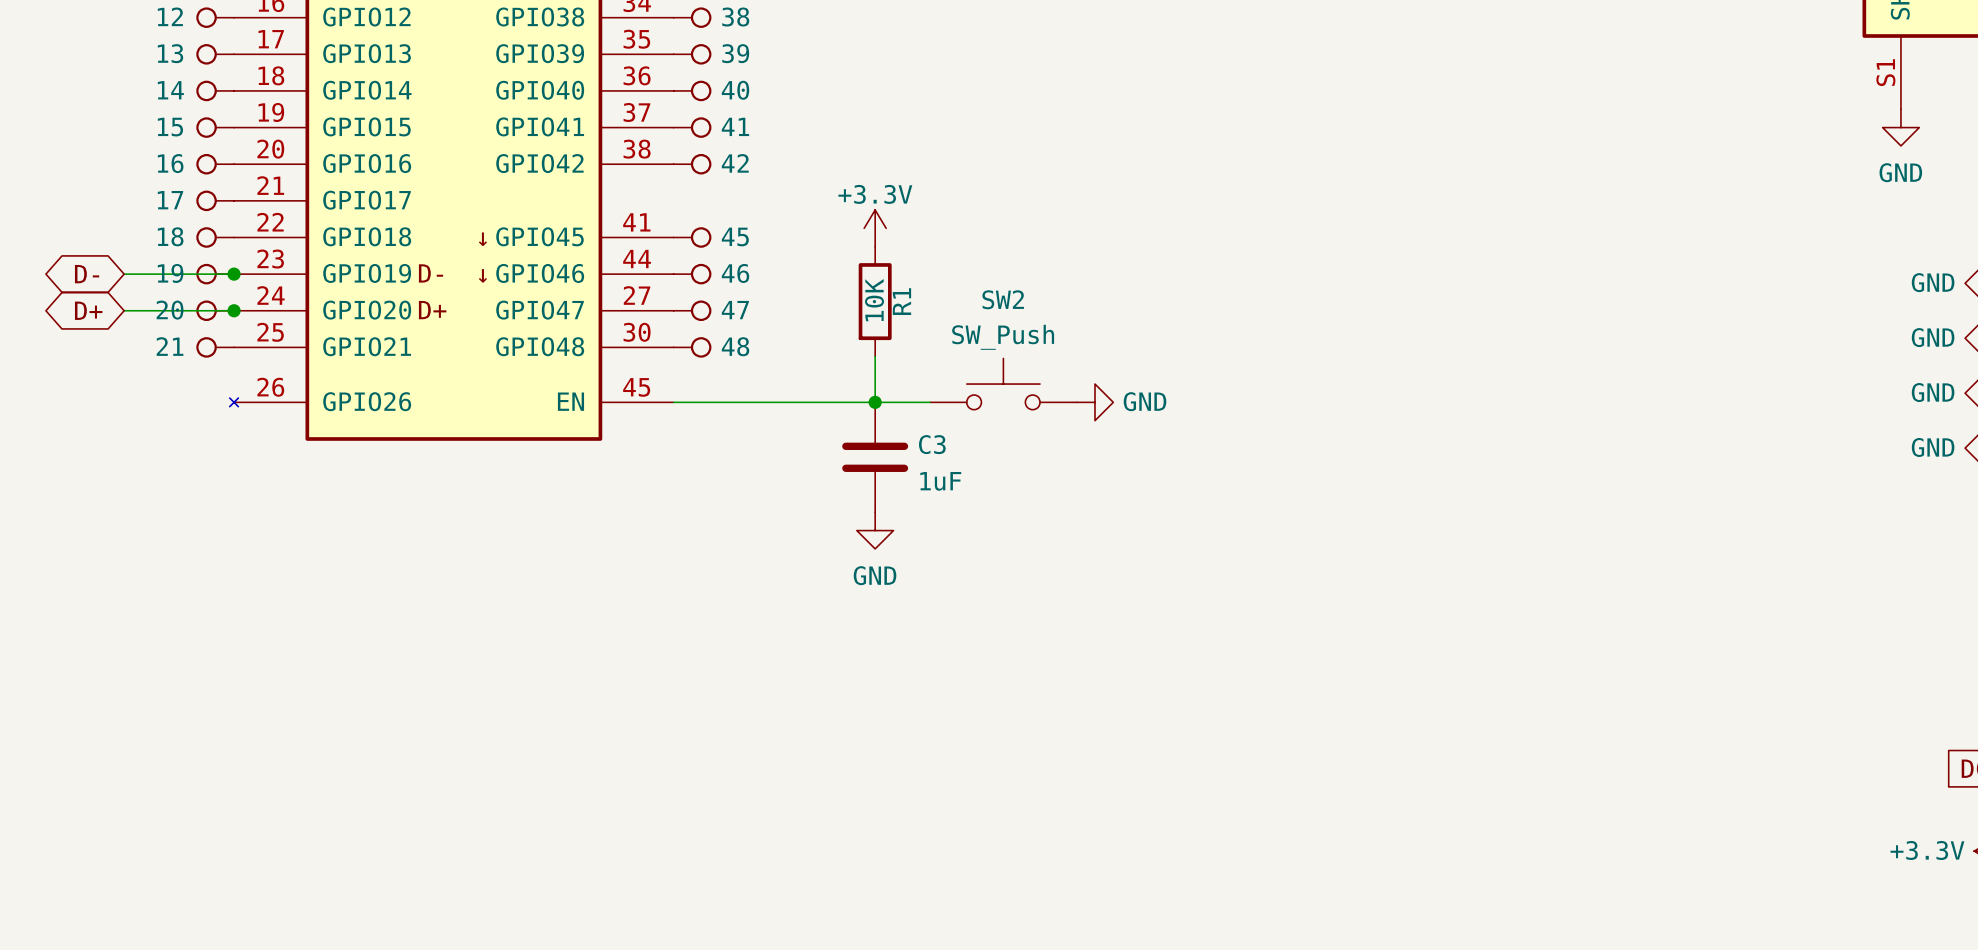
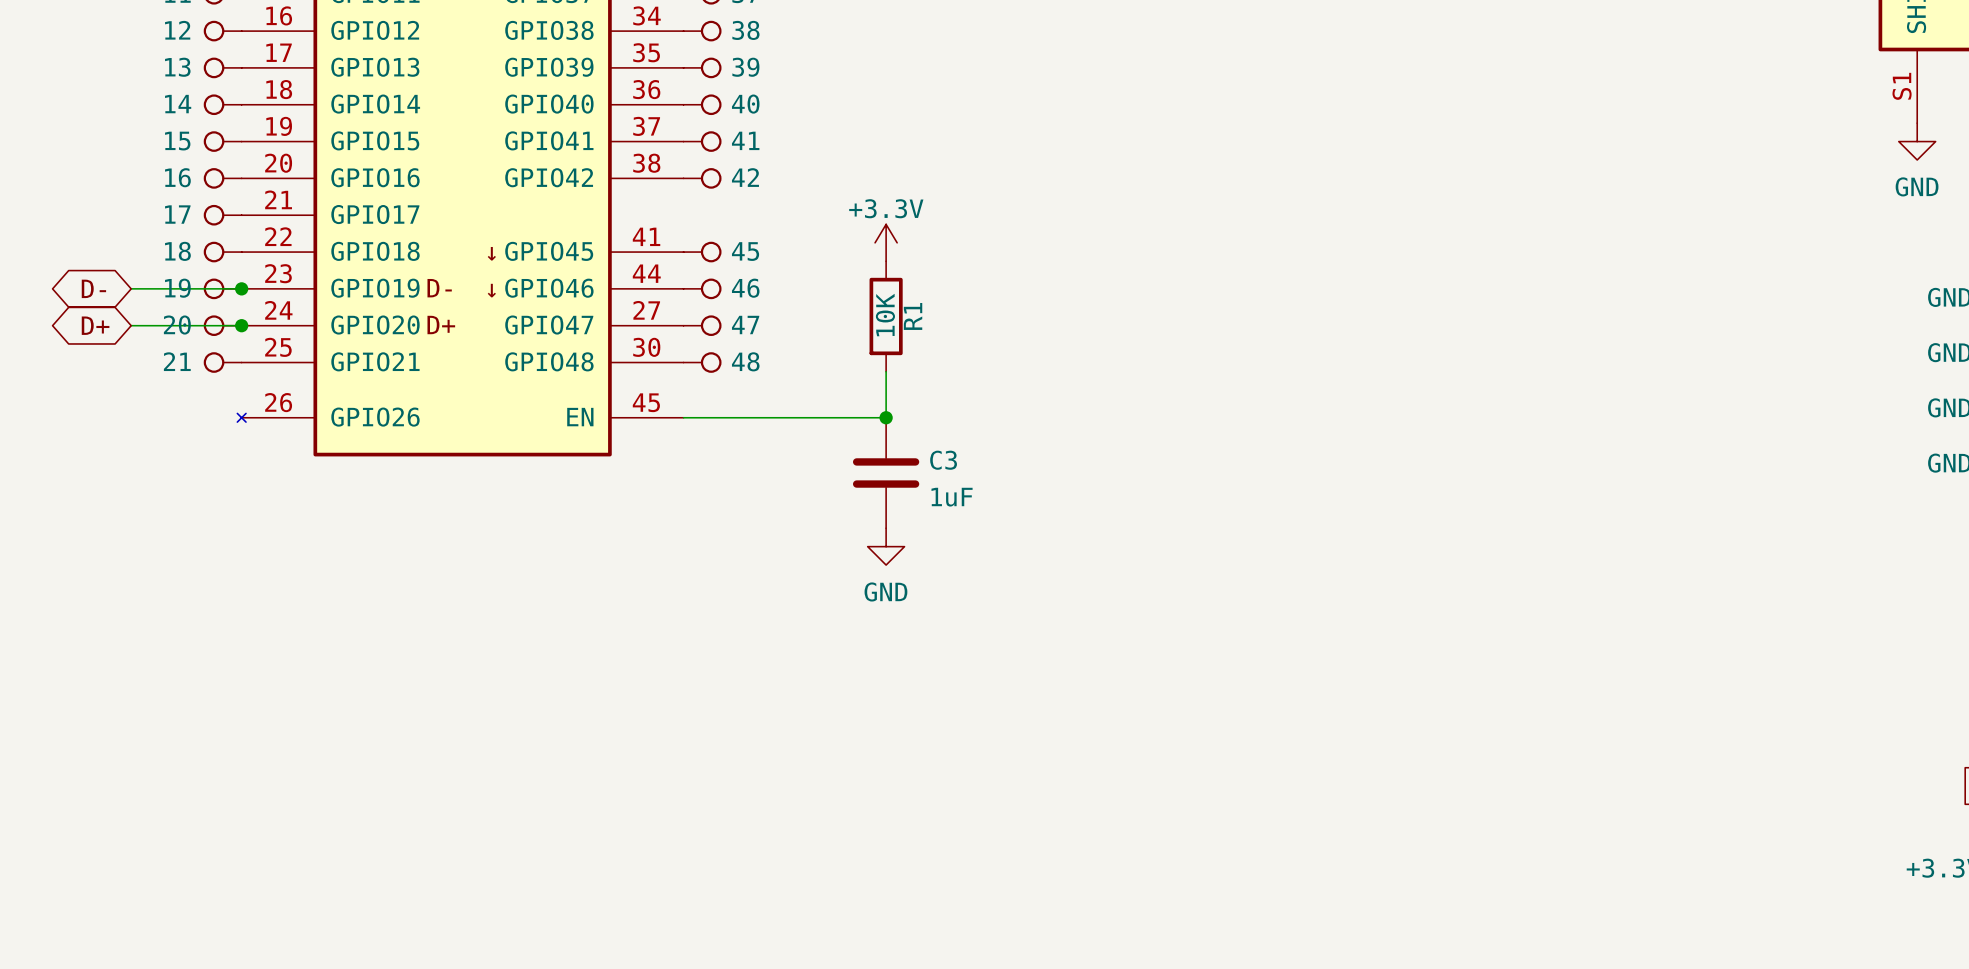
SW2: SW_Push (1003, 384) -> none
wire: (875, 402) (930, 402) -> none
power symbol: GND (1094, 402) -> none

